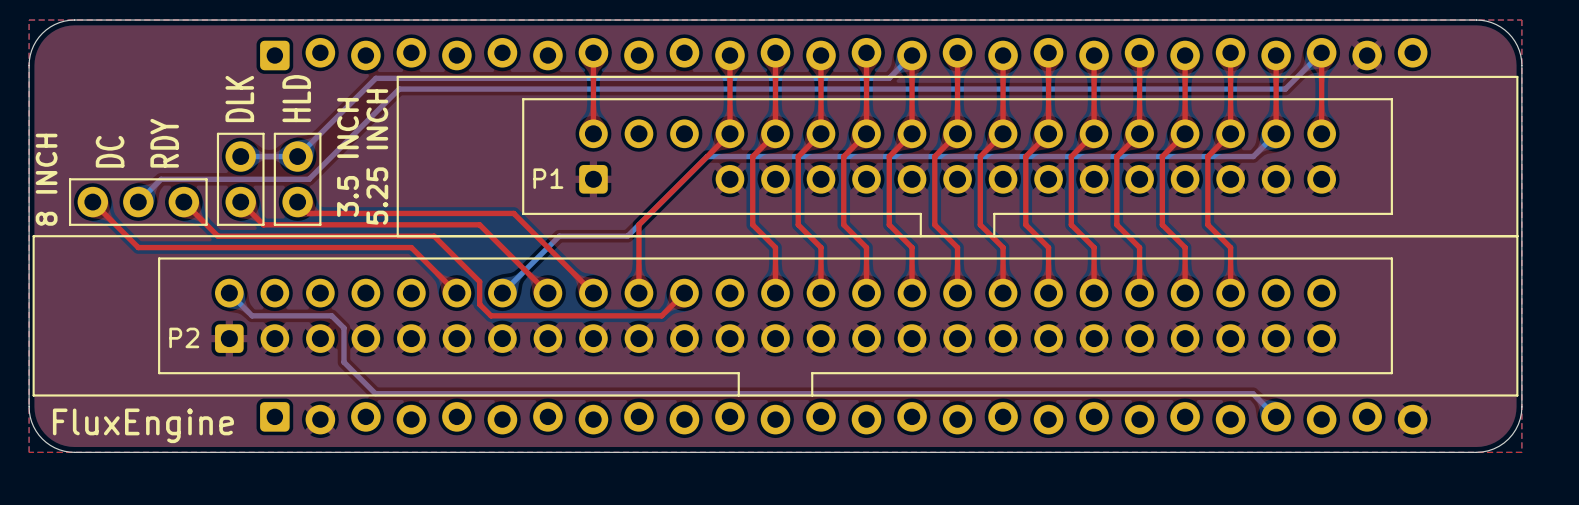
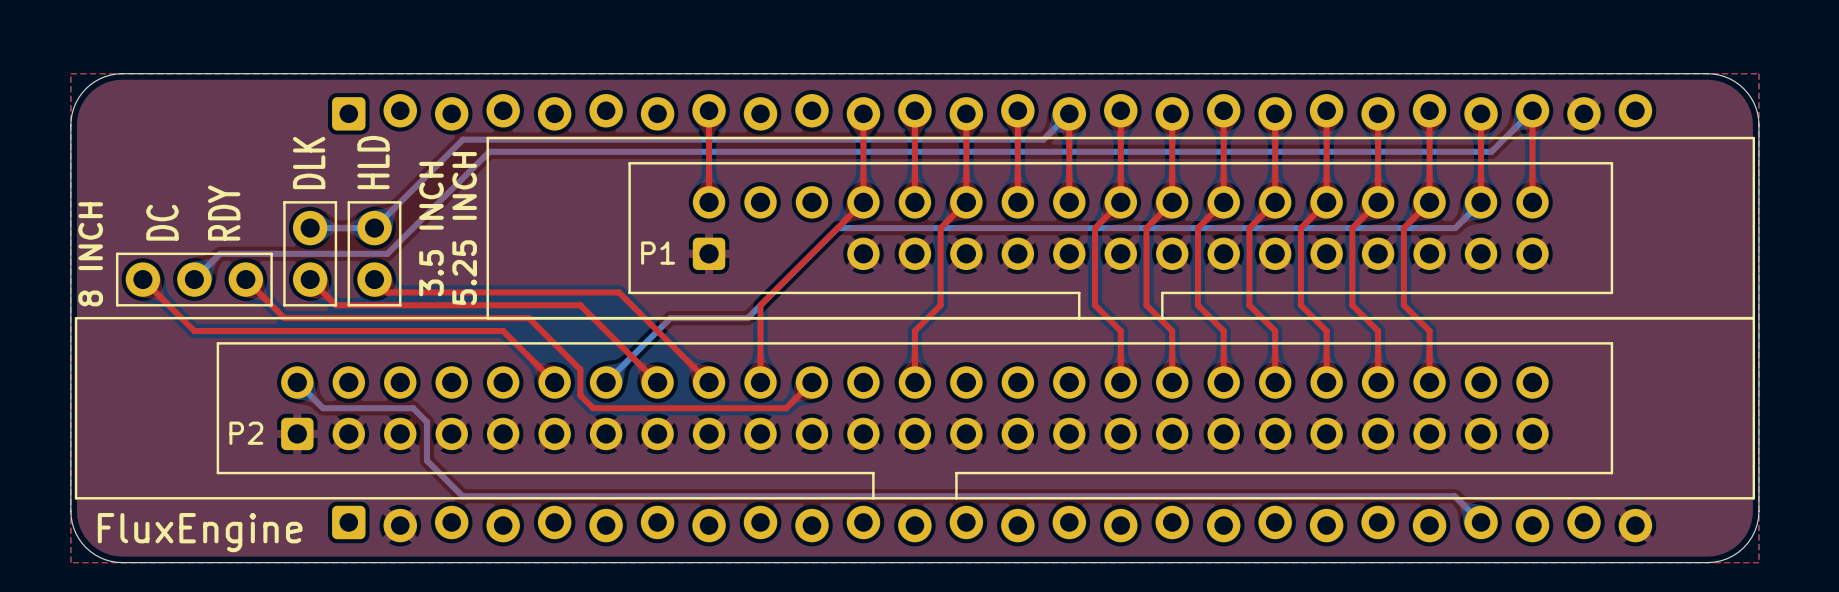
top track: (775, 133) (752, 156) (752, 224) (775, 247) -> none
top track: (866, 133) (843, 156) (843, 224) (866, 247) (866, 293) -> none
top track: (912, 133) (889, 156) (889, 224) (912, 247) (912, 293) -> none
top track: (798, 224) (821, 247) (821, 293) -> (940, 305) (914, 331)

